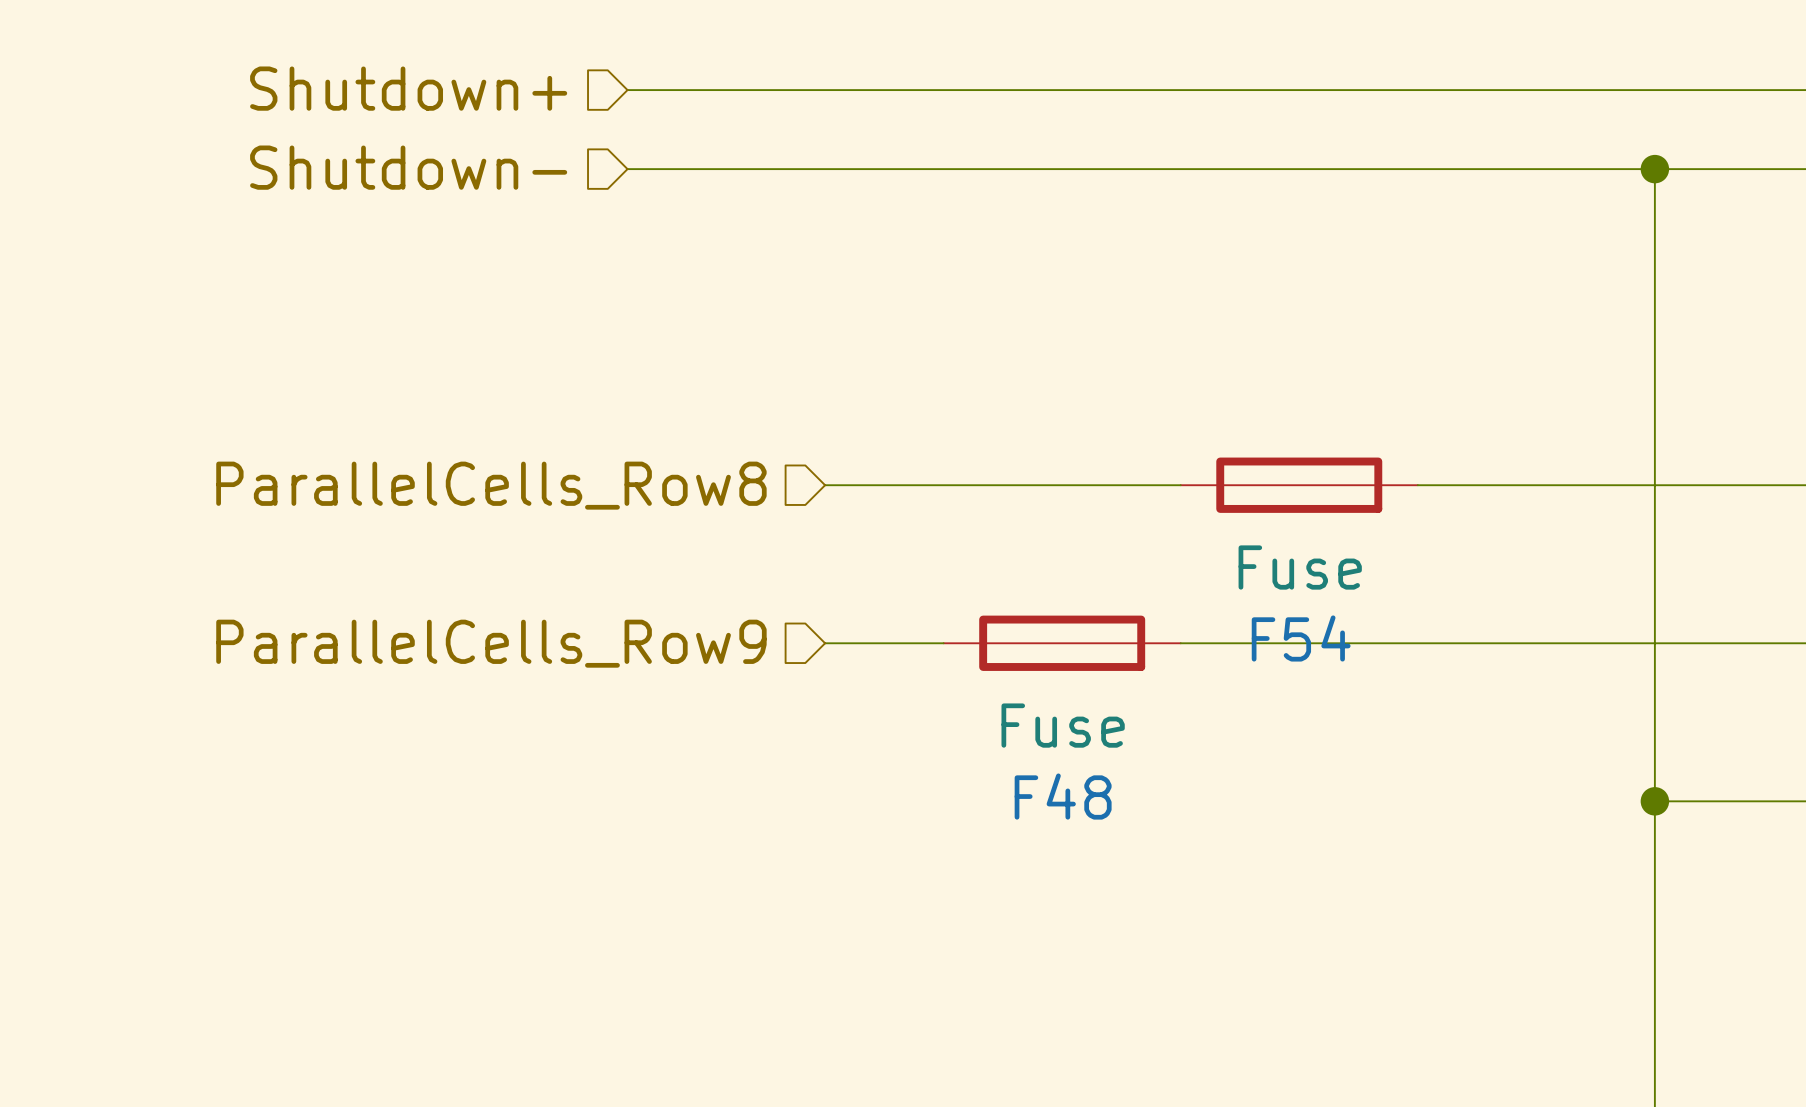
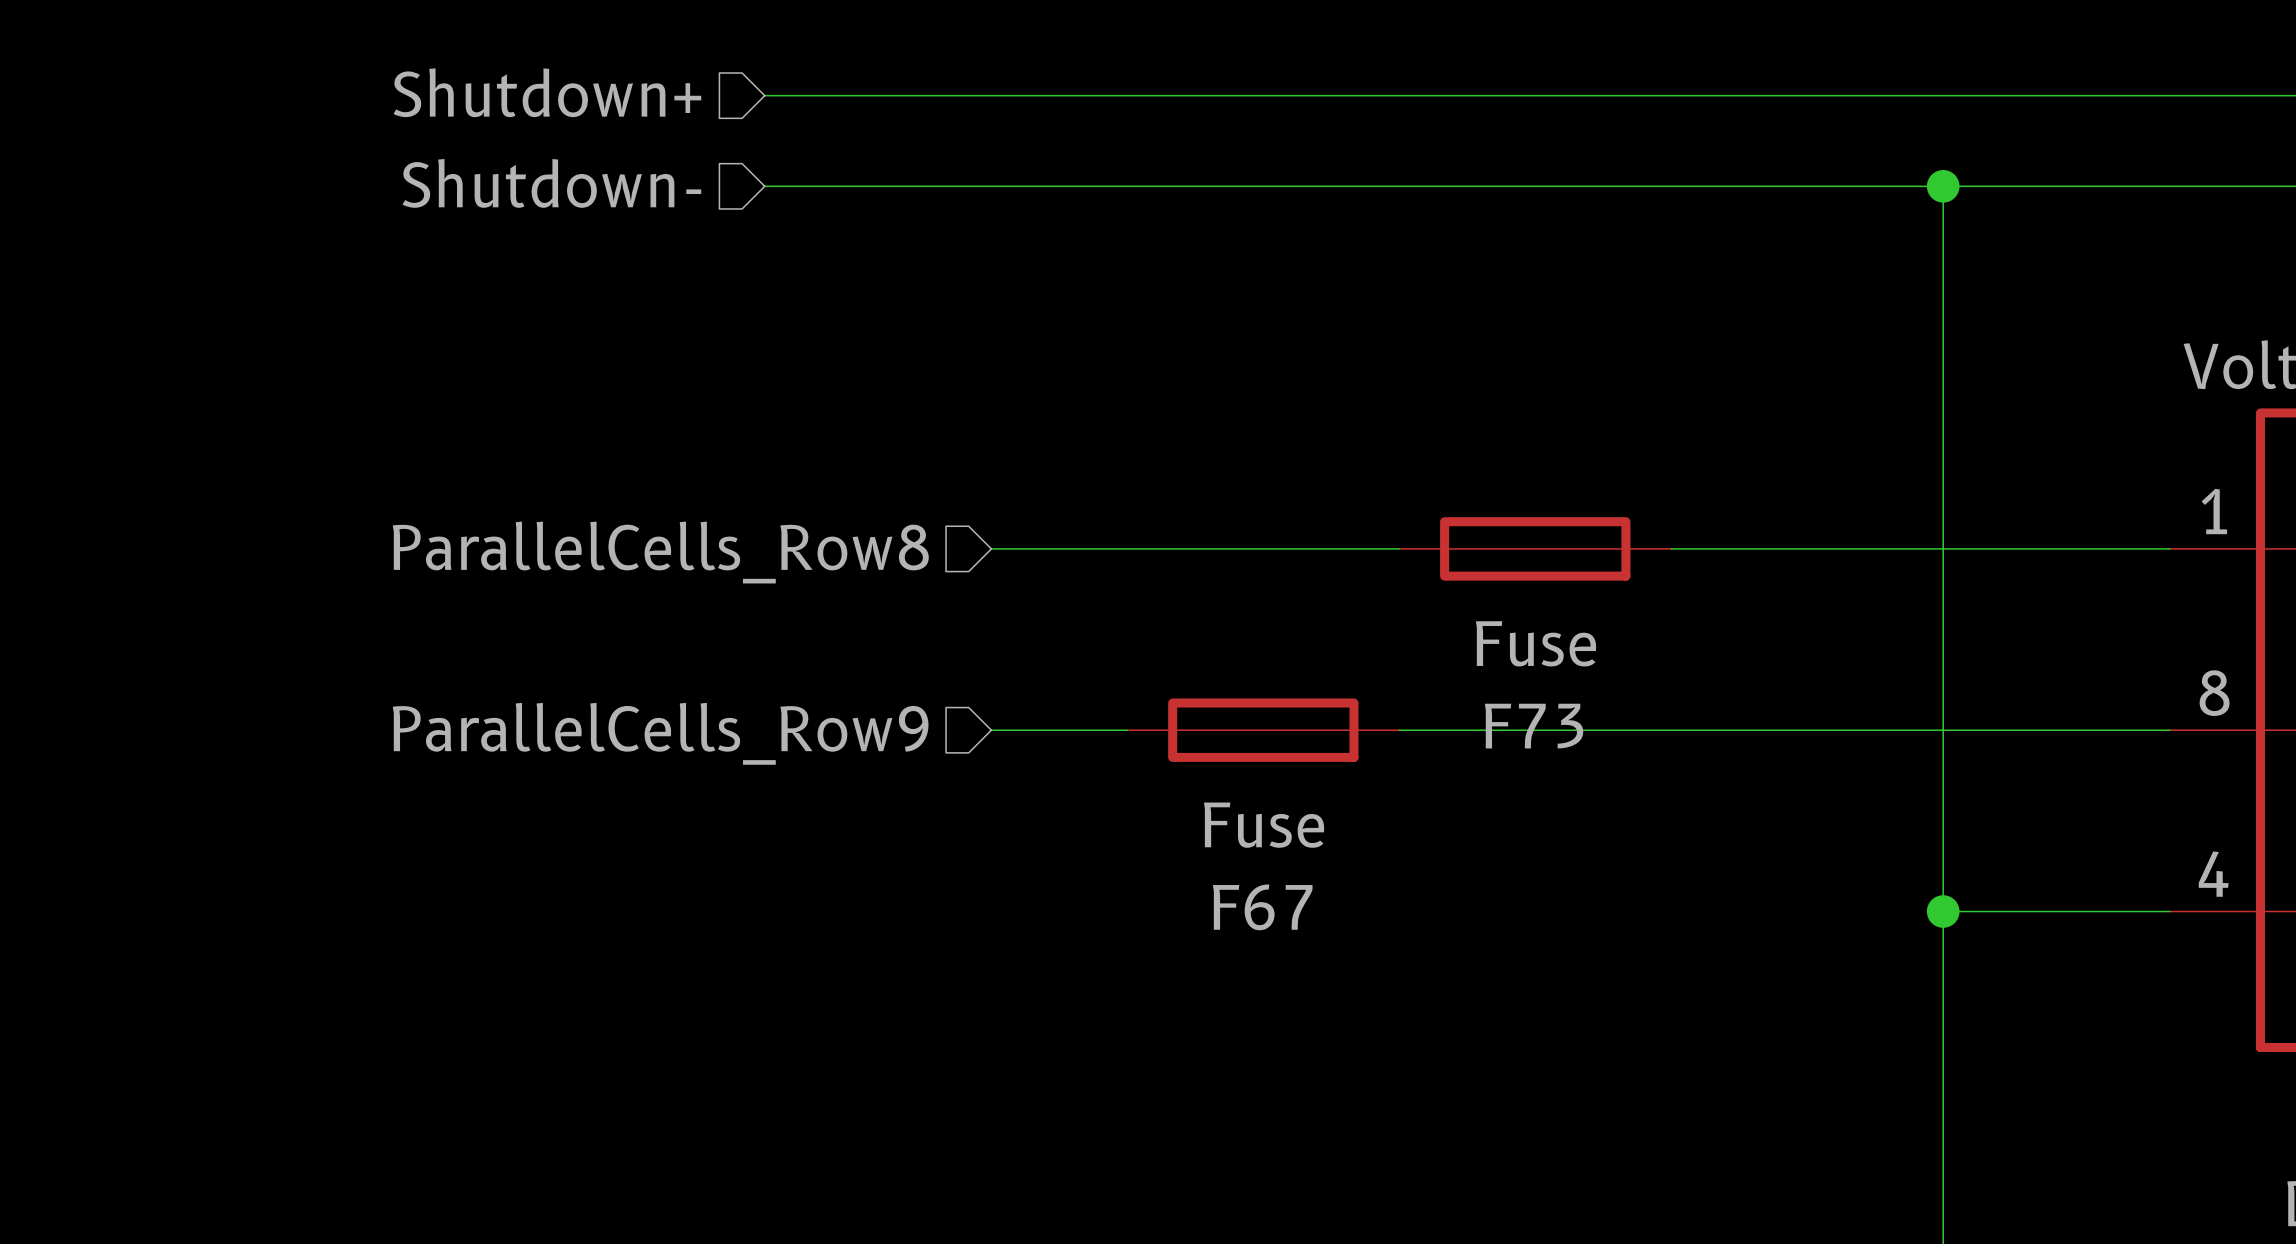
F54 name: F54 (1301, 638) -> F73 (1534, 726)
F48 name: F48 (1063, 796) -> F67 (1262, 907)

